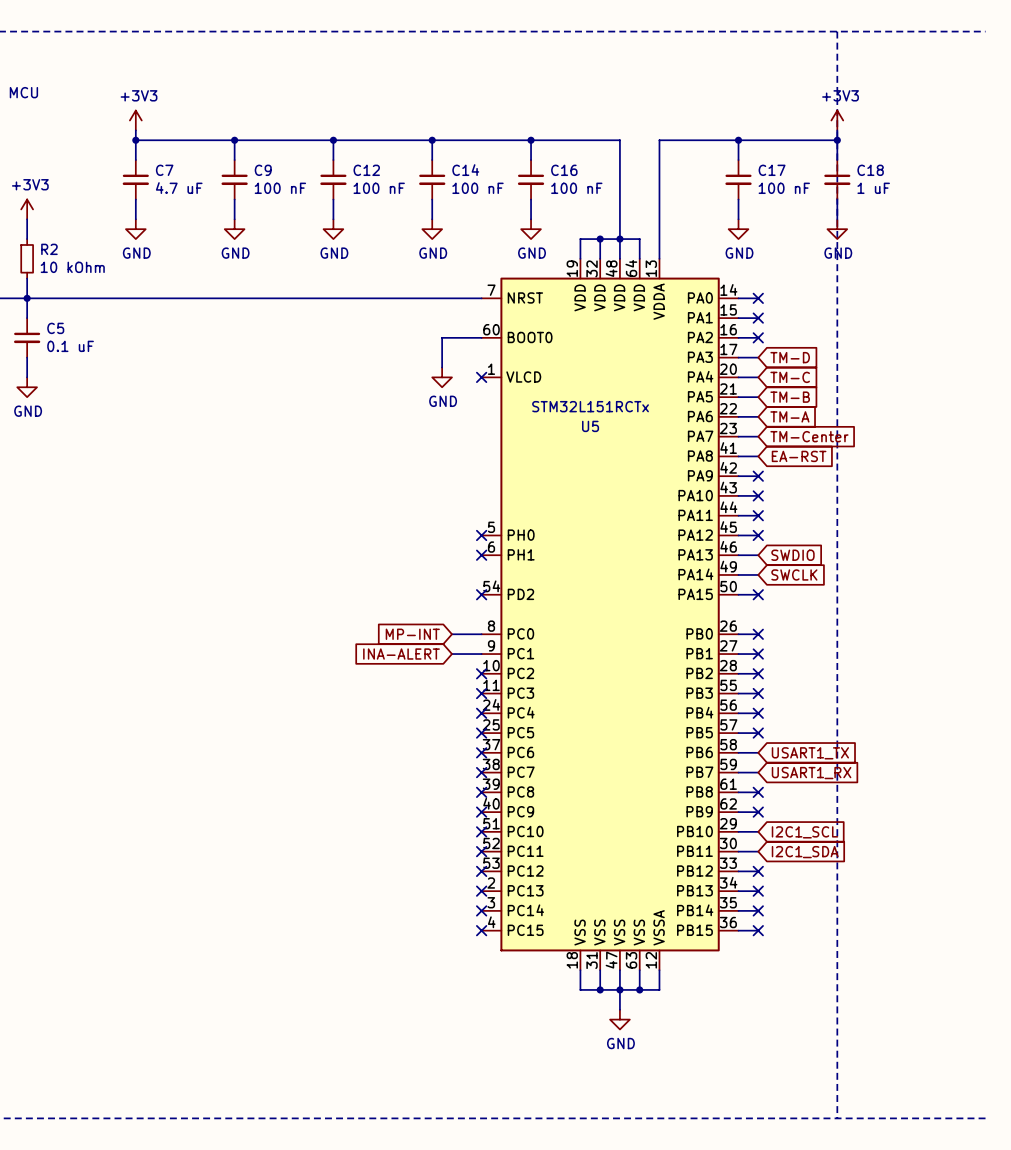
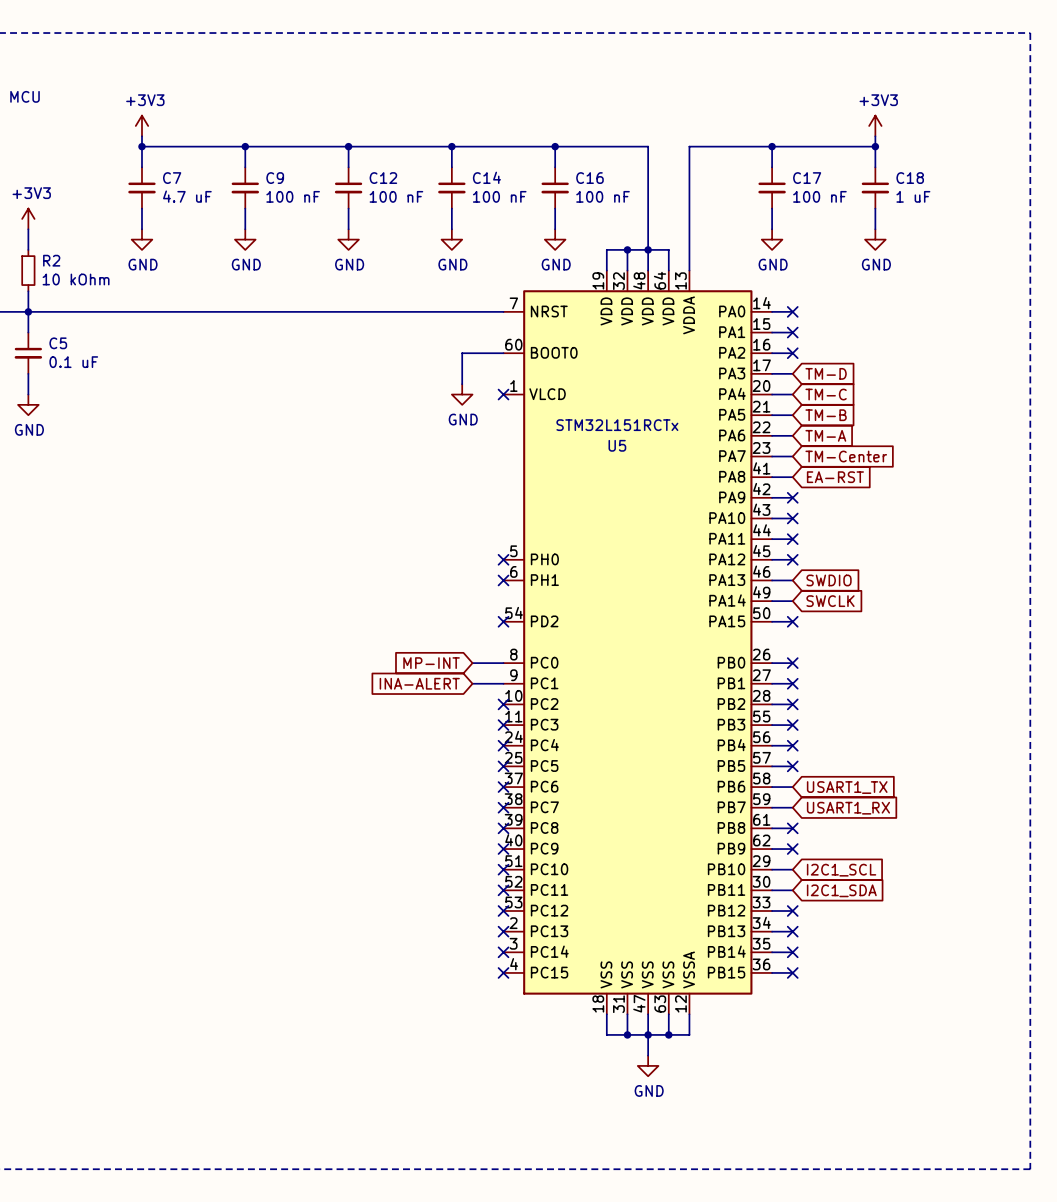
line: (837, 31) (837, 1118) -> (1030, 33) (1030, 1169)

